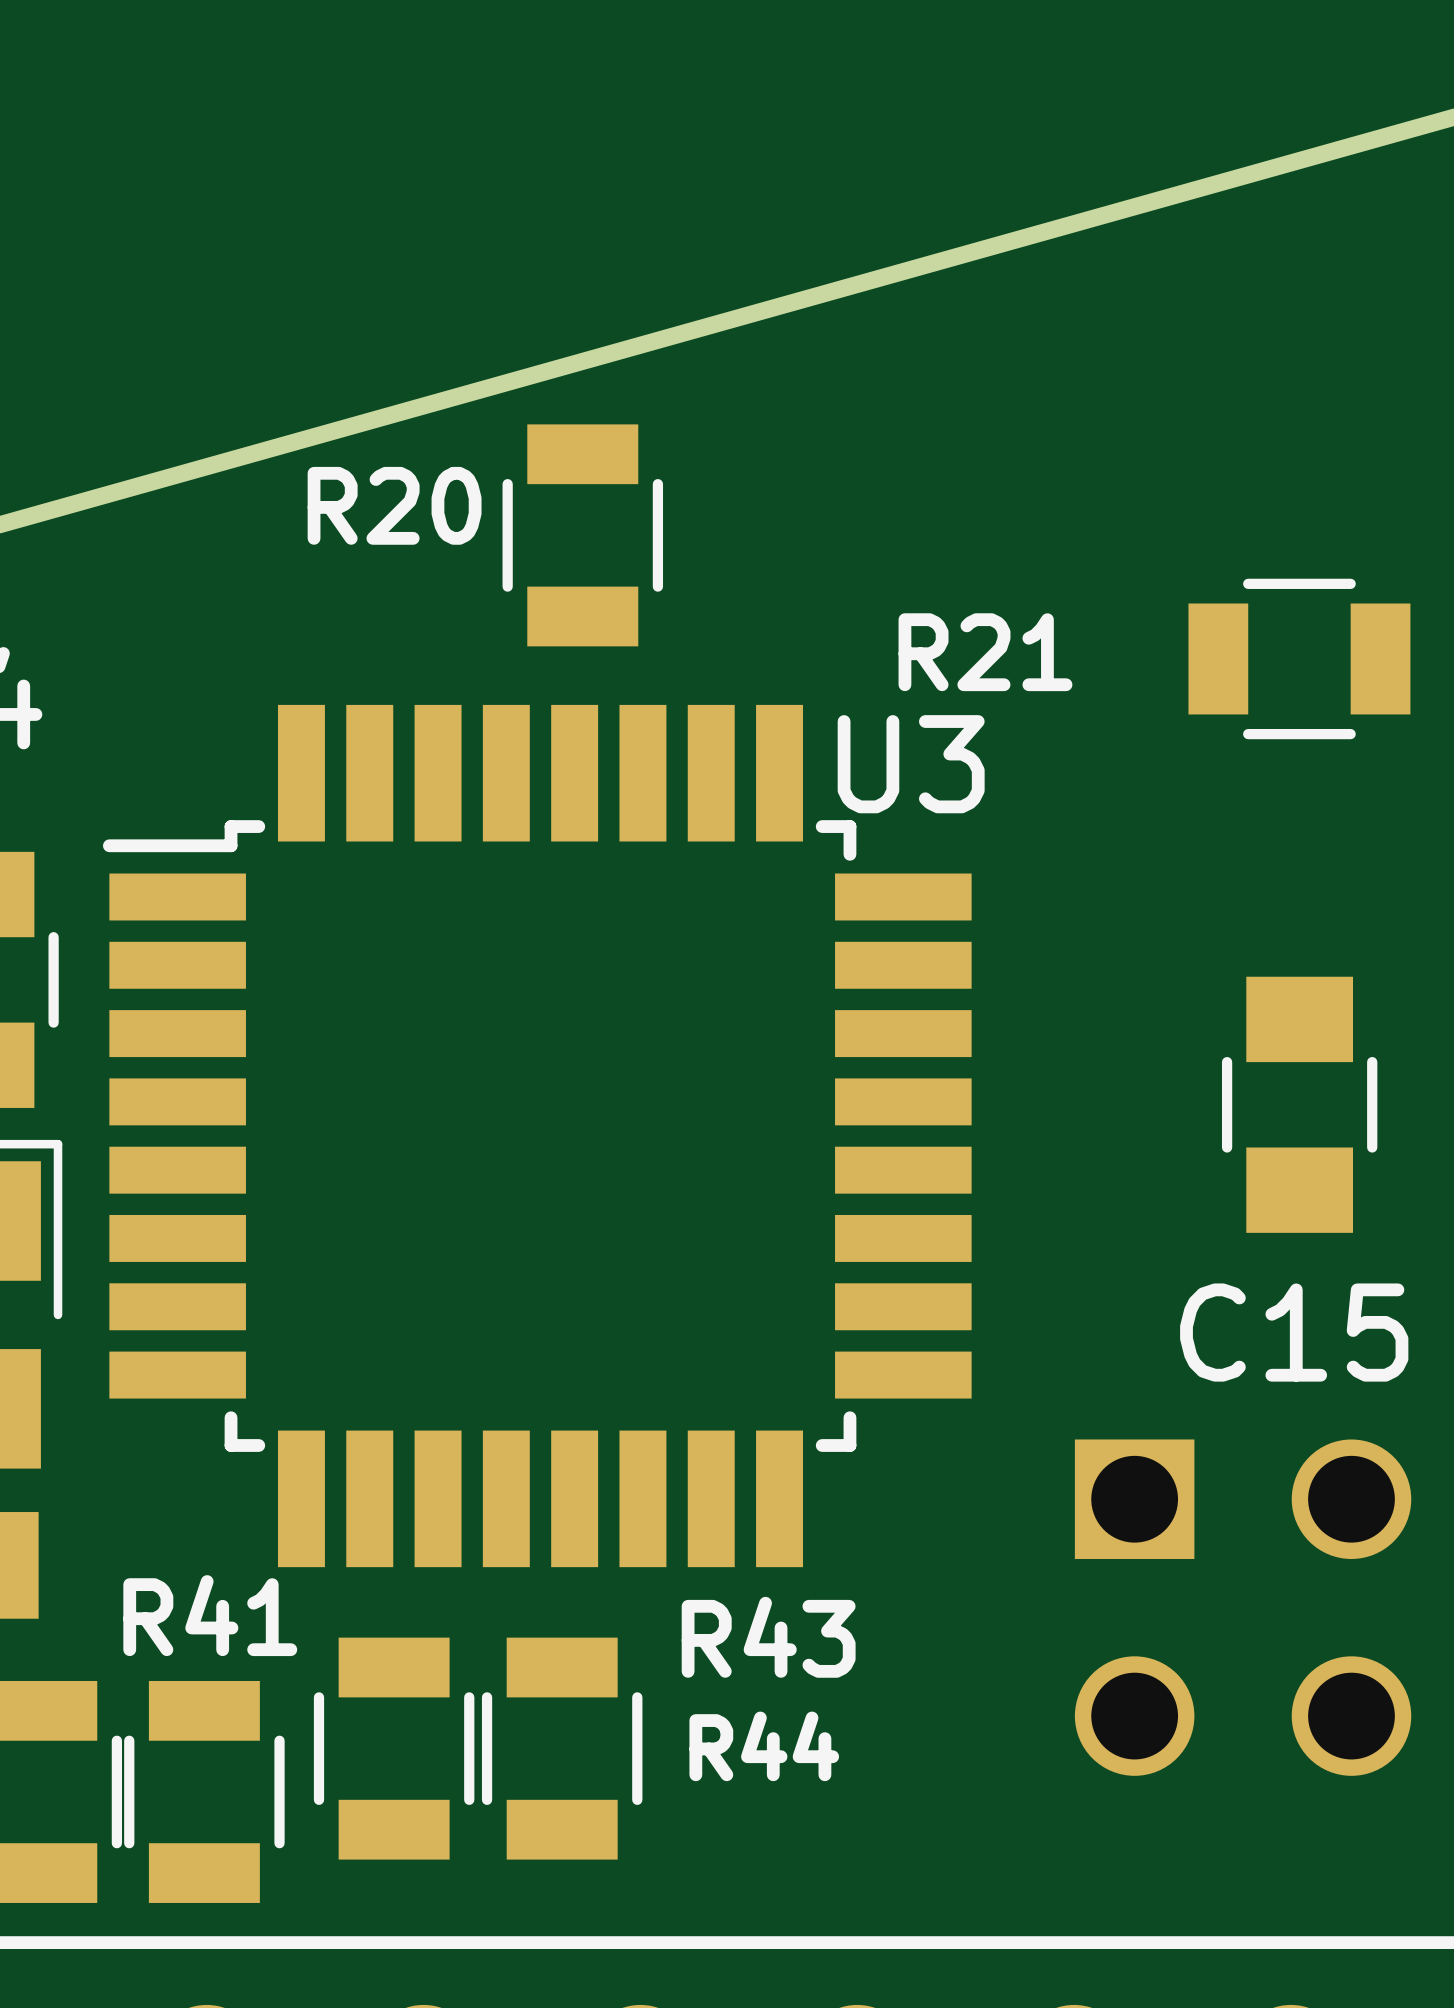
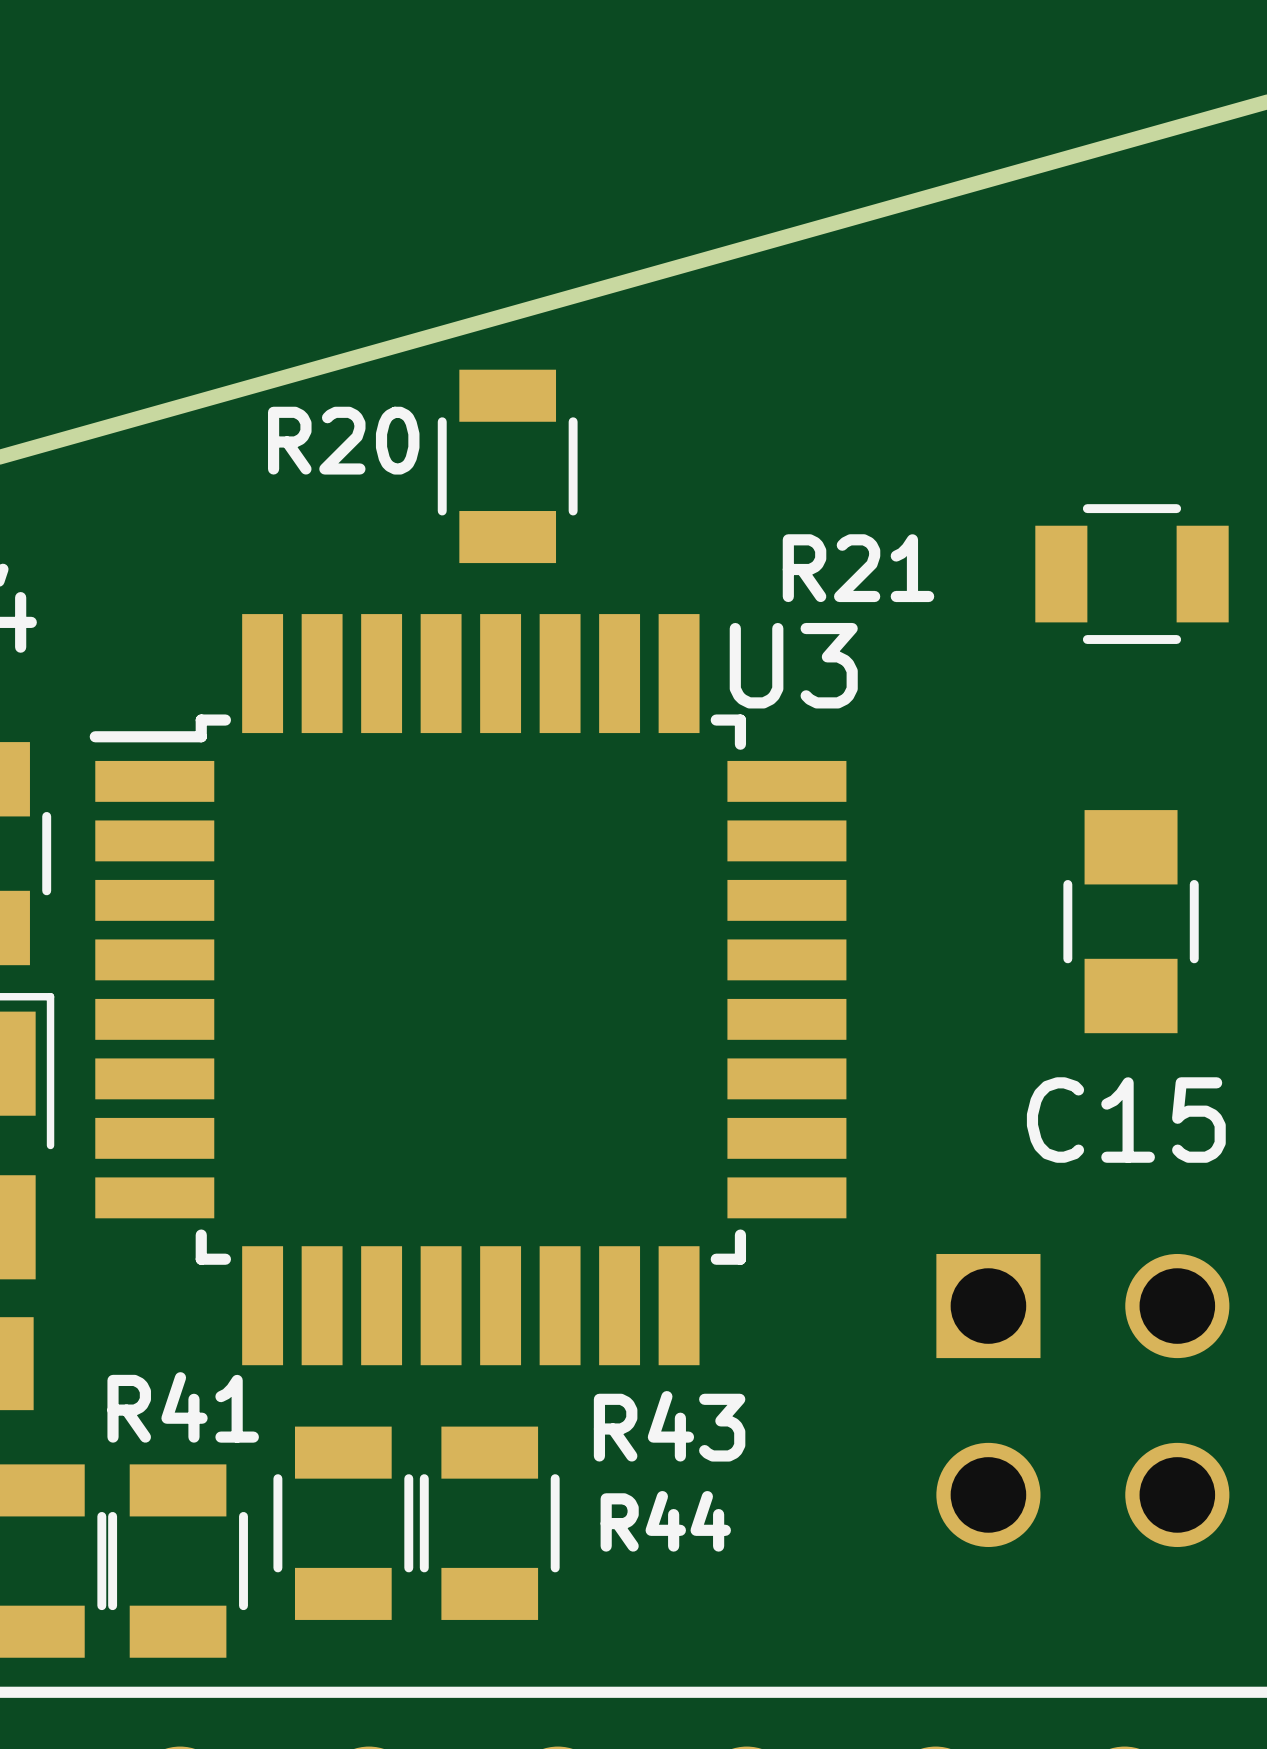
C15 position: (1299, 1104) -> (1131, 921)

